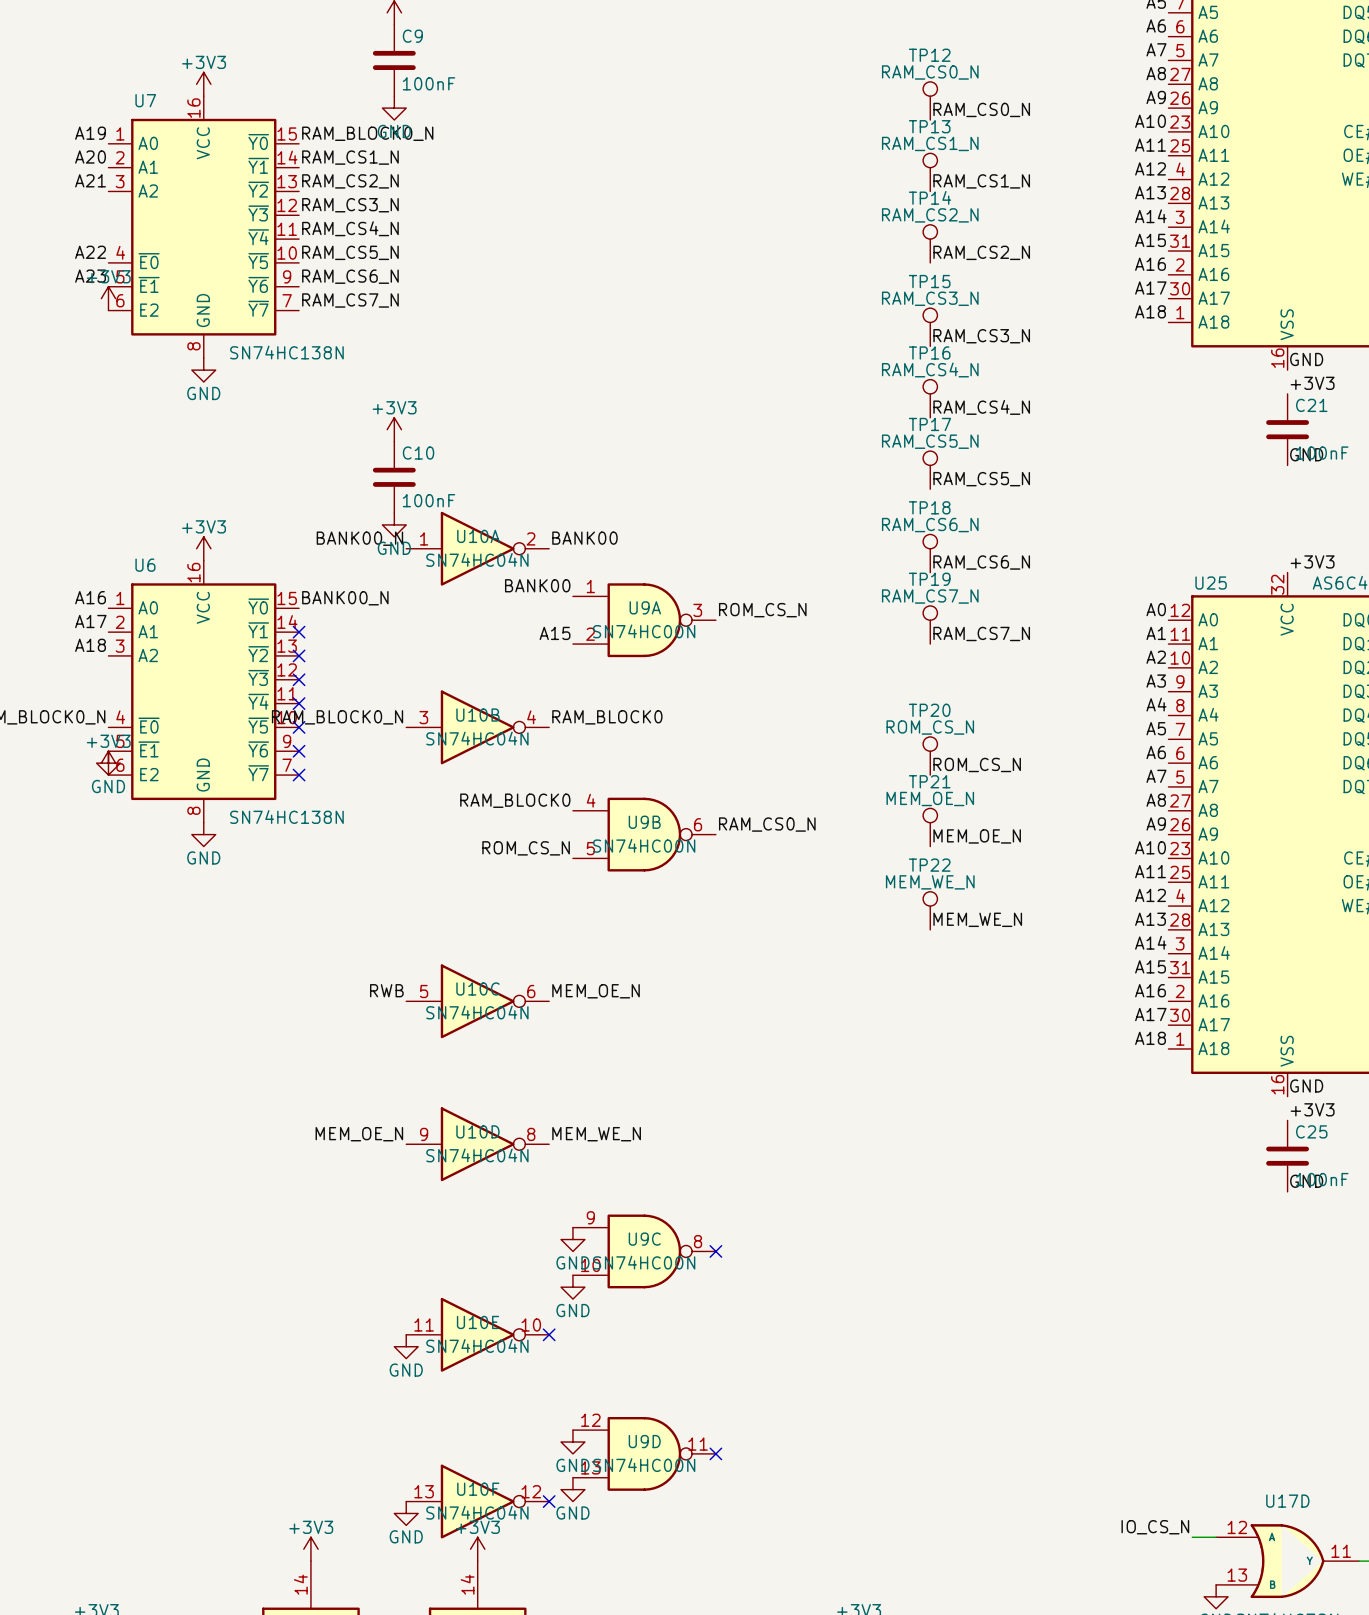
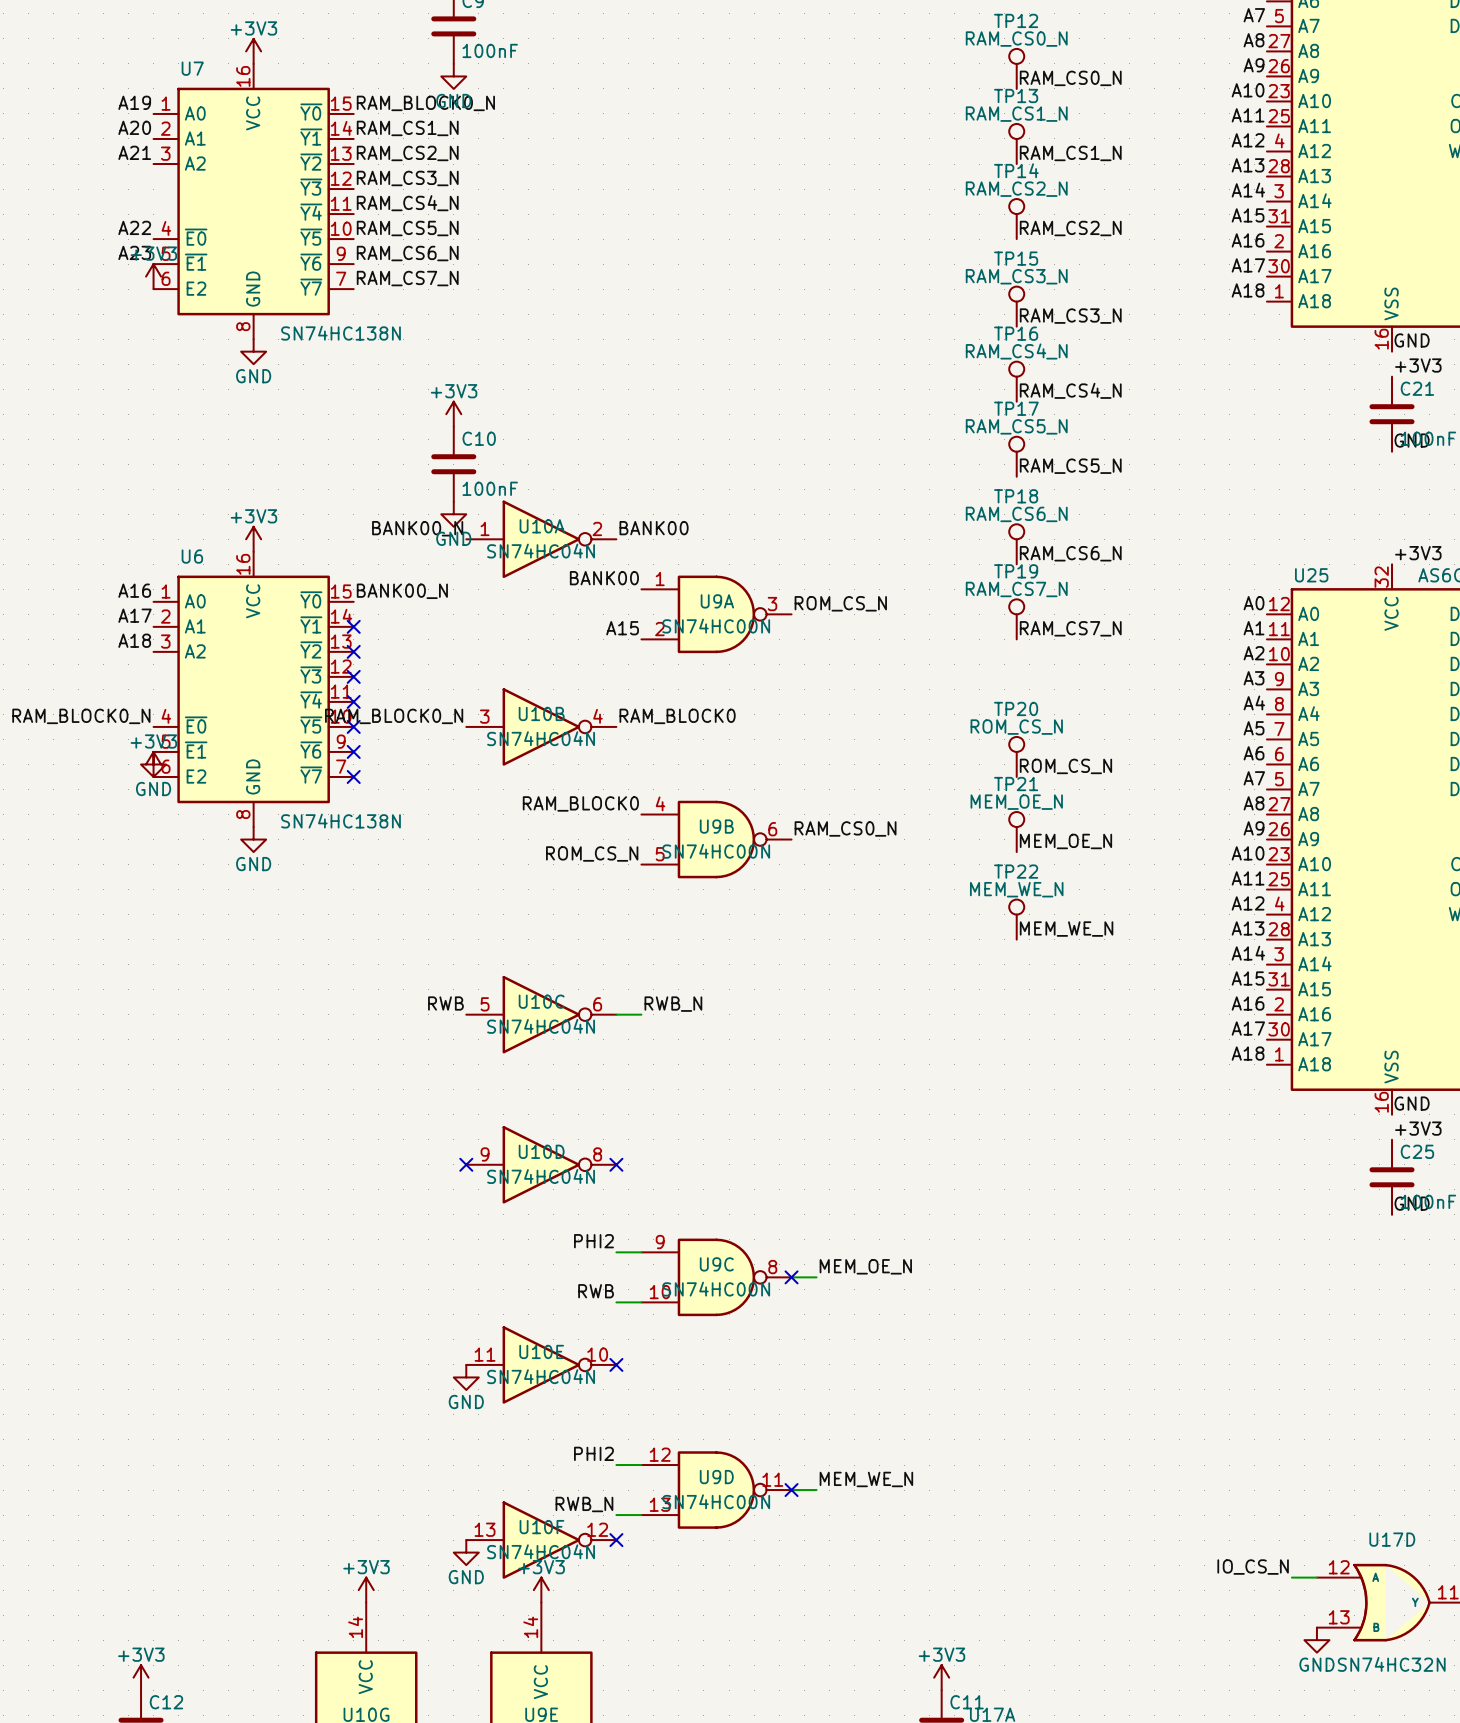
label: MEM_OE_N (596, 991) -> none
label: none -> RWB_N (673, 1004)
wire: none -> (616, 1014) (641, 1014)
label: MEM_OE_N (359, 1134) -> none
label: MEM_WE_N (596, 1134) -> none
no-connect mark: none -> (466, 1164)
no-connect mark: none -> (616, 1164)
label: none -> PHI2 (593, 1241)
wire: none -> (616, 1252) (641, 1252)
power symbol: GND (572, 1239) -> none
label: none -> MEM_OE_N (865, 1266)
wire: none -> (791, 1277) (816, 1277)
label: none -> RWB (596, 1291)
wire: none -> (616, 1302) (641, 1302)
power symbol: GND (572, 1287) -> none
label: none -> PHI2 (593, 1453)
wire: none -> (616, 1465) (641, 1465)
power symbol: GND (572, 1442) -> none
label: none -> MEM_WE_N (866, 1479)
wire: none -> (791, 1490) (816, 1490)
label: none -> RWB_N (584, 1504)
wire: none -> (616, 1515) (641, 1515)
power symbol: GND (572, 1489) -> none

